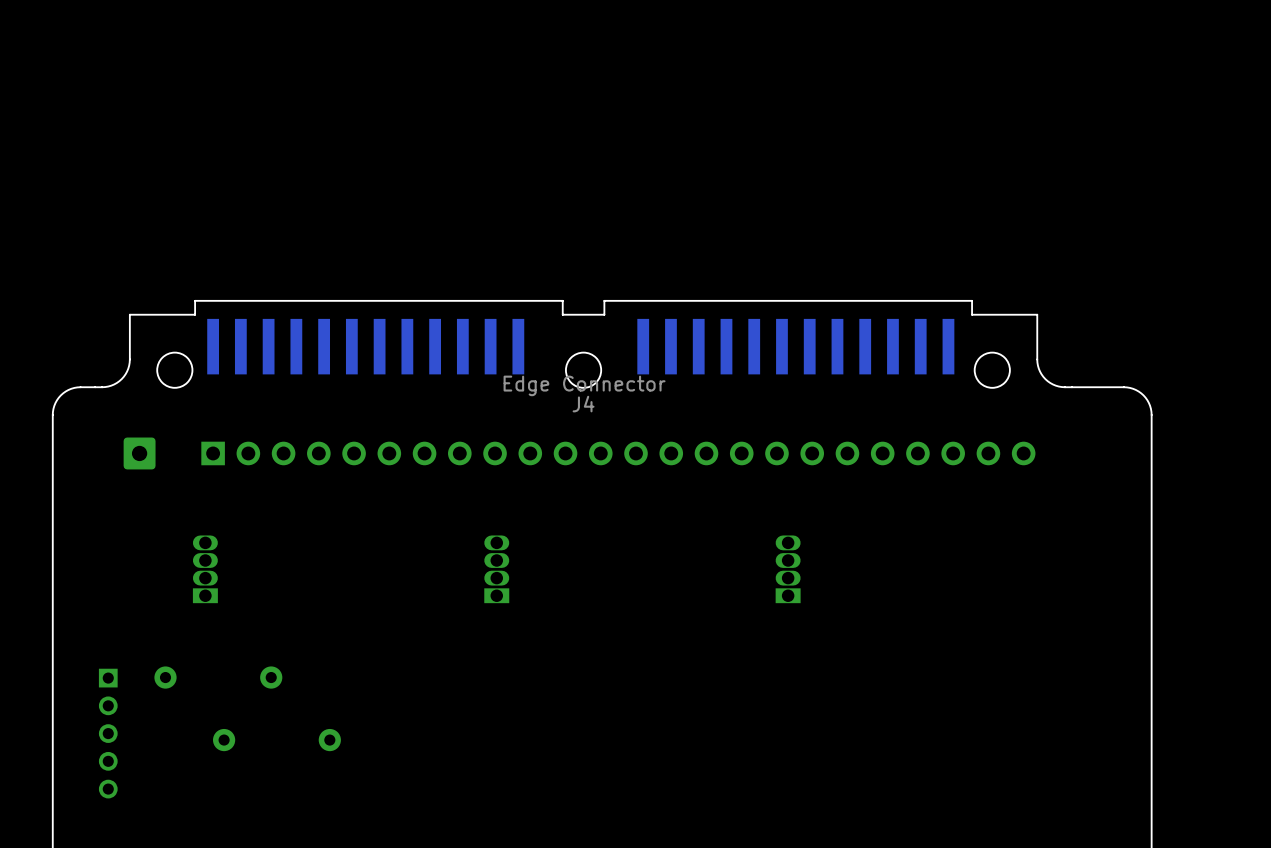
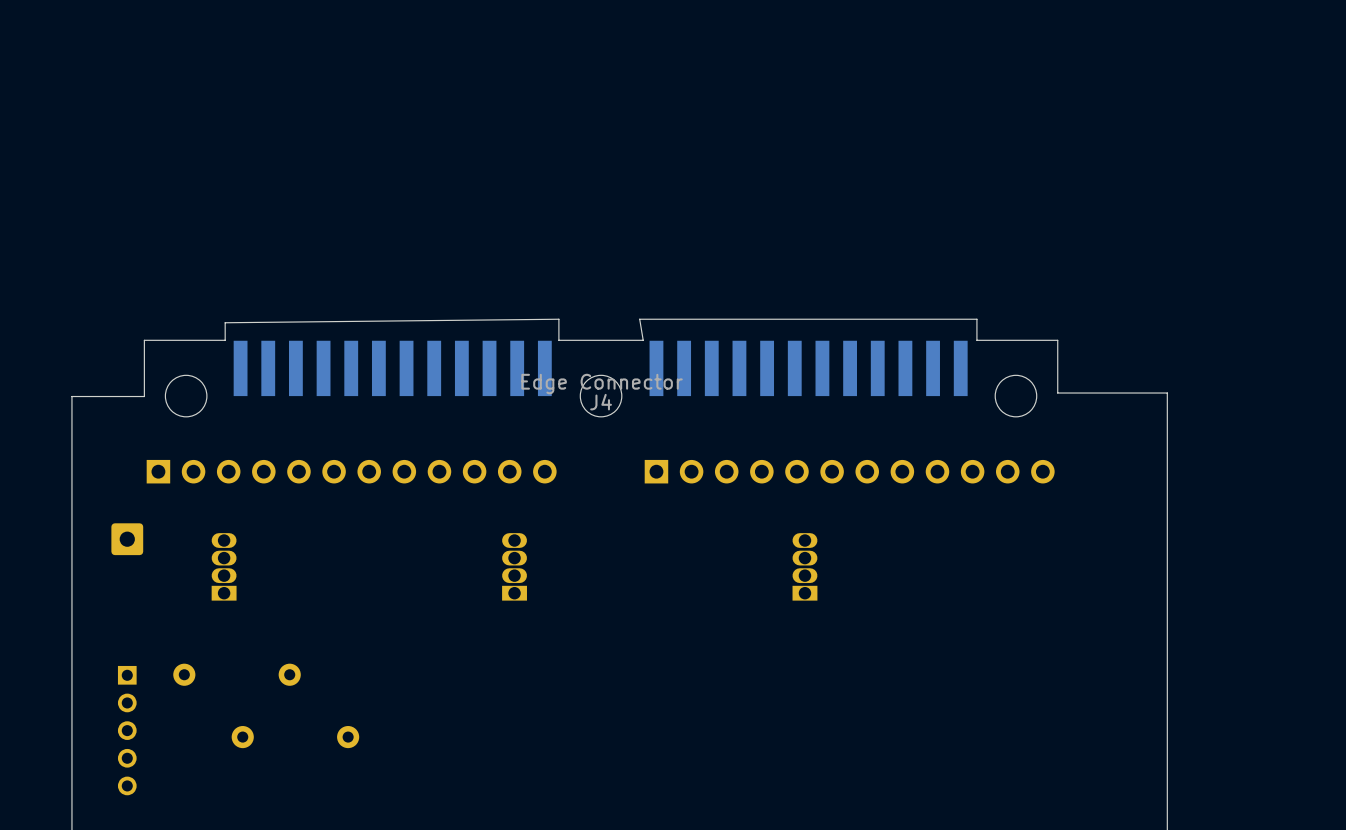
J4 footprint: [94, 300, 1073, 388] -> [144, 318, 1059, 417]
board edge: (95, 387) (77, 387) (65, 391) (57, 400) (52, 414) -> (144, 396) (71, 396) (71, 413)
board edge: (1071, 387) (1133, 388) (1145, 397) (1150, 405) (1151, 414) -> (1057, 393) (1167, 393) (1167, 413)
part position: (139, 453) -> (127, 539)
part: (618, 453) -> none
part: none -> (351, 471)
part: none -> (849, 471)

